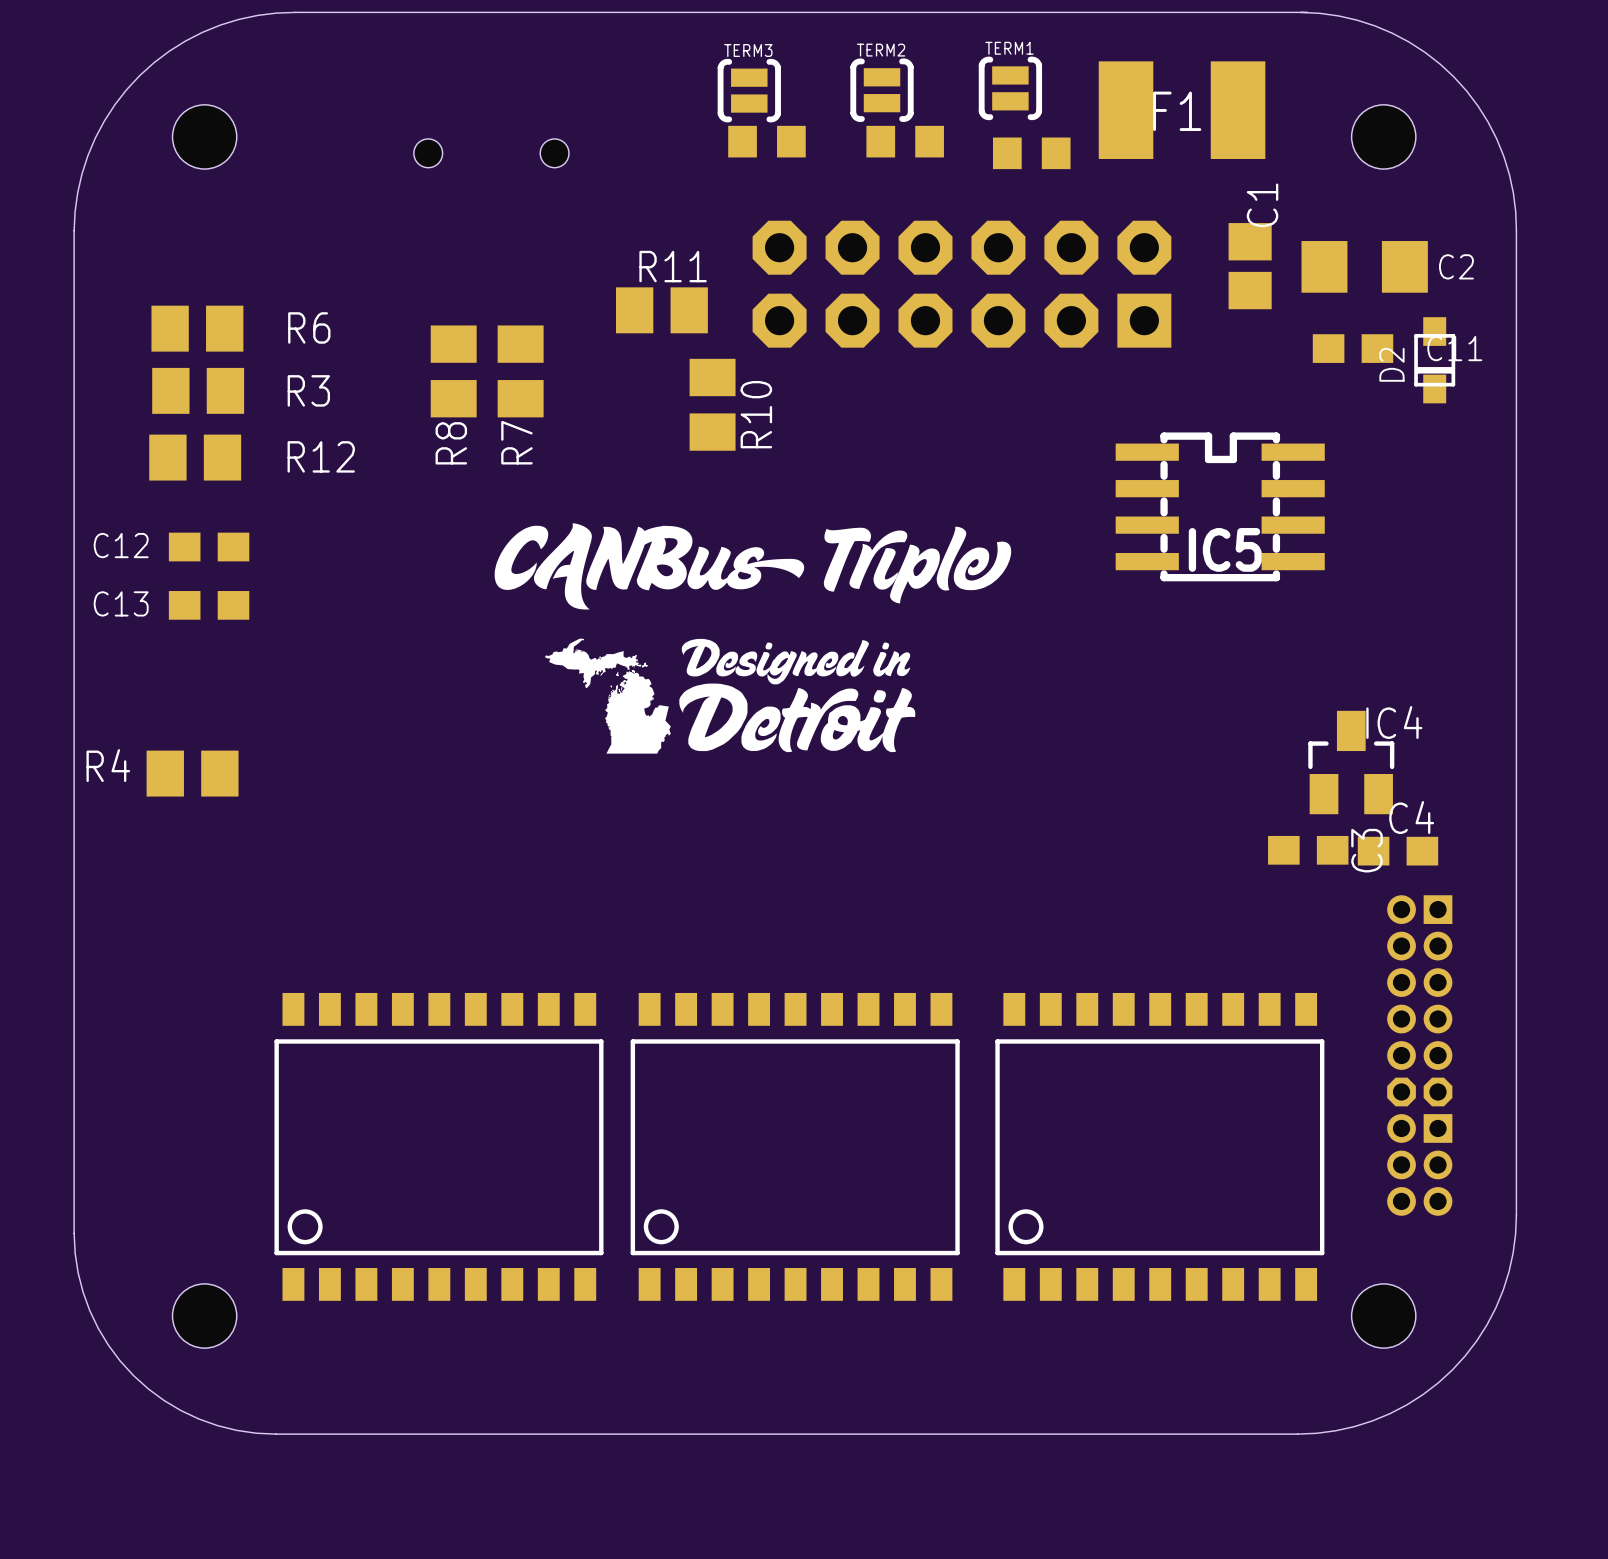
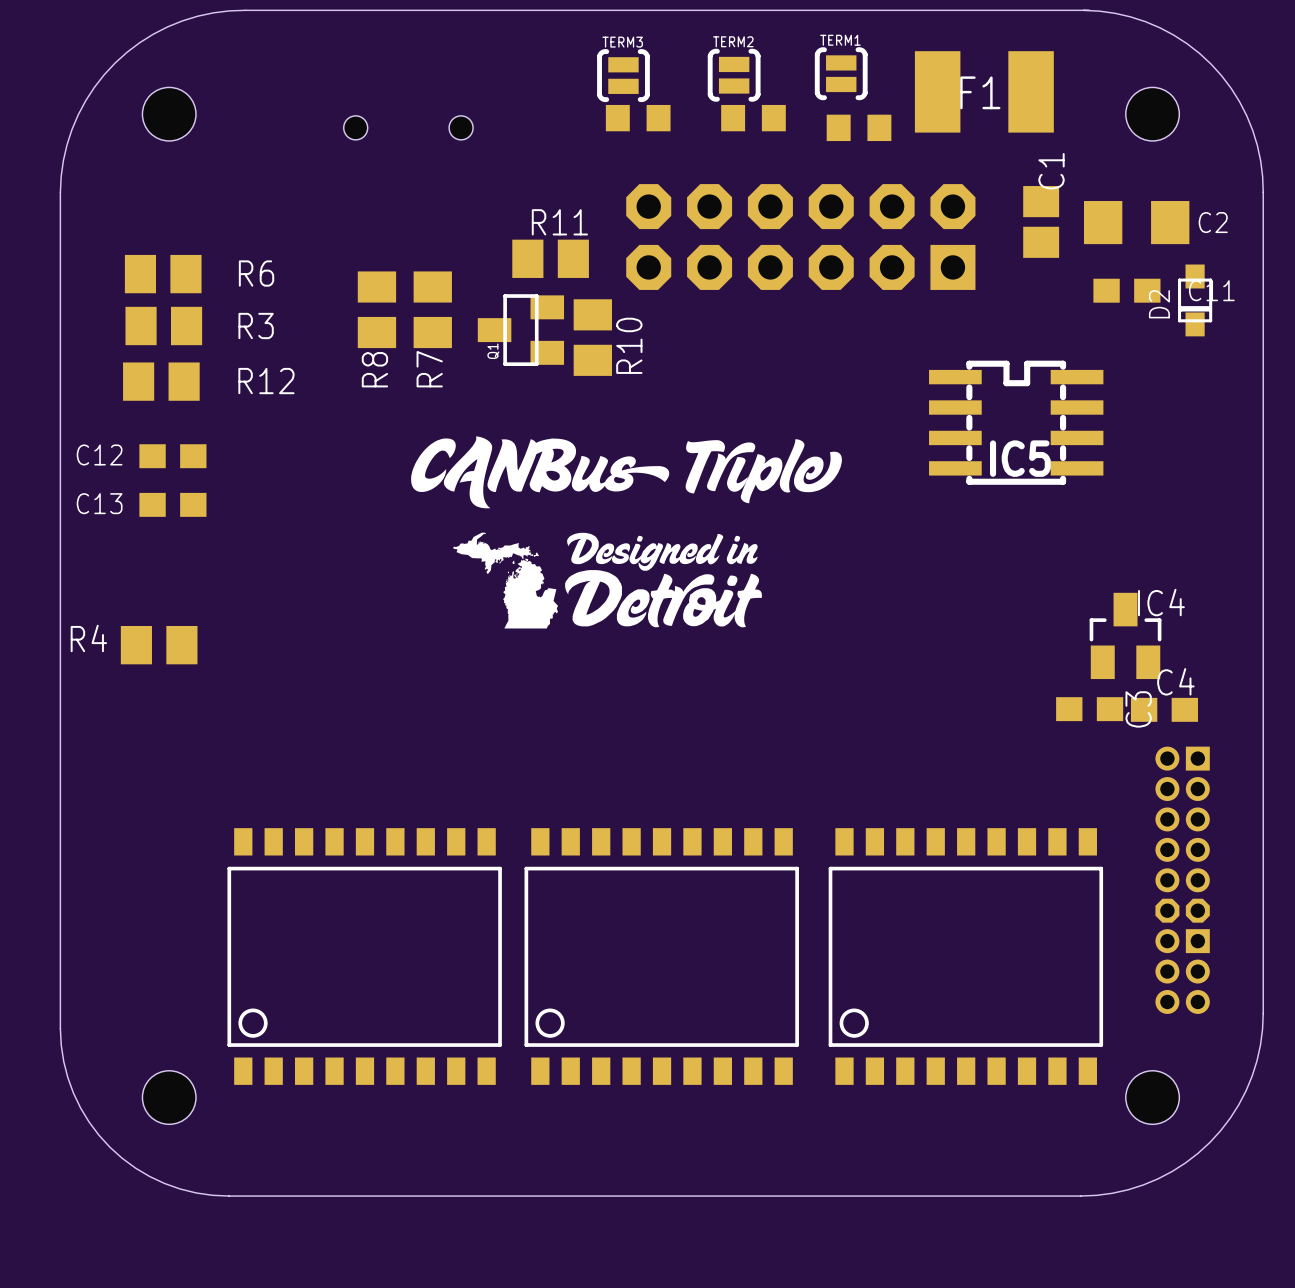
Q1: none -> (520, 330)

